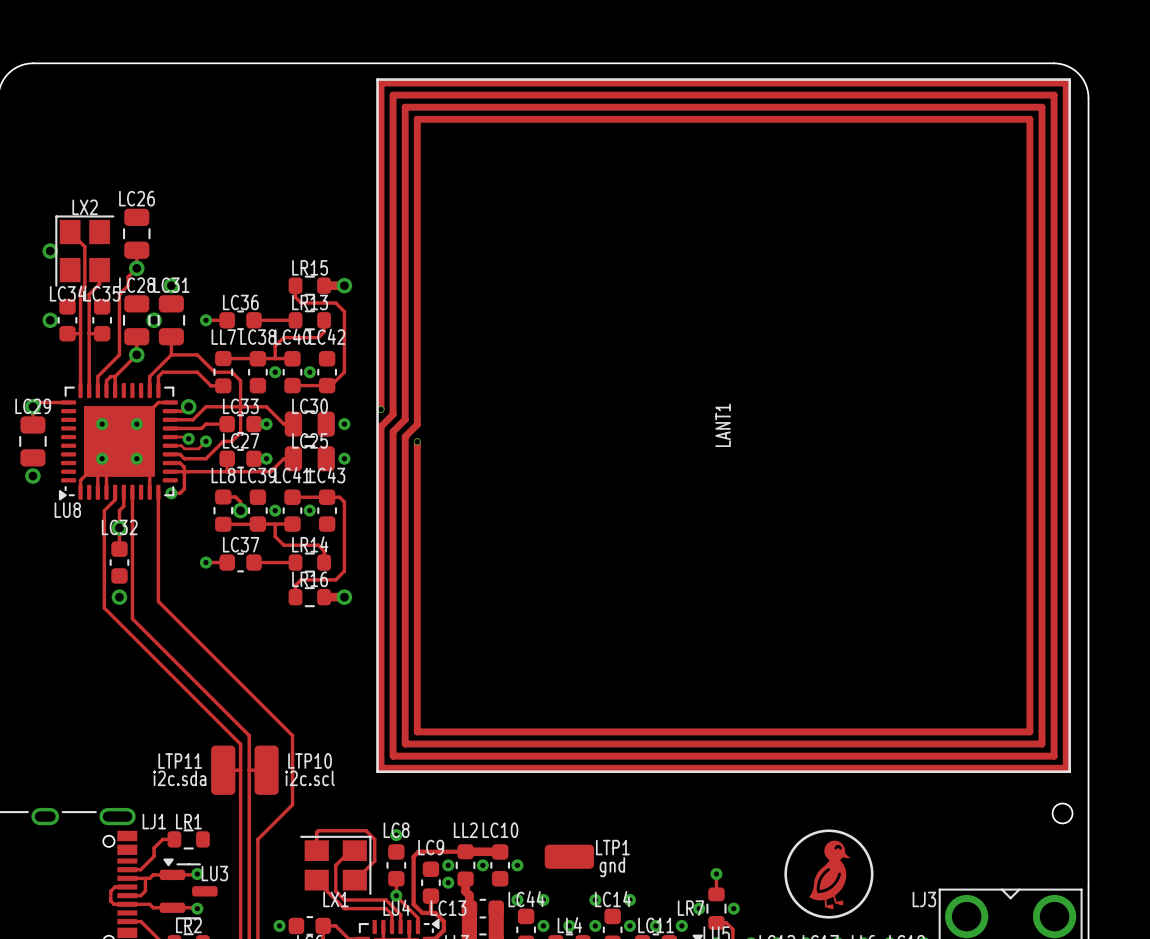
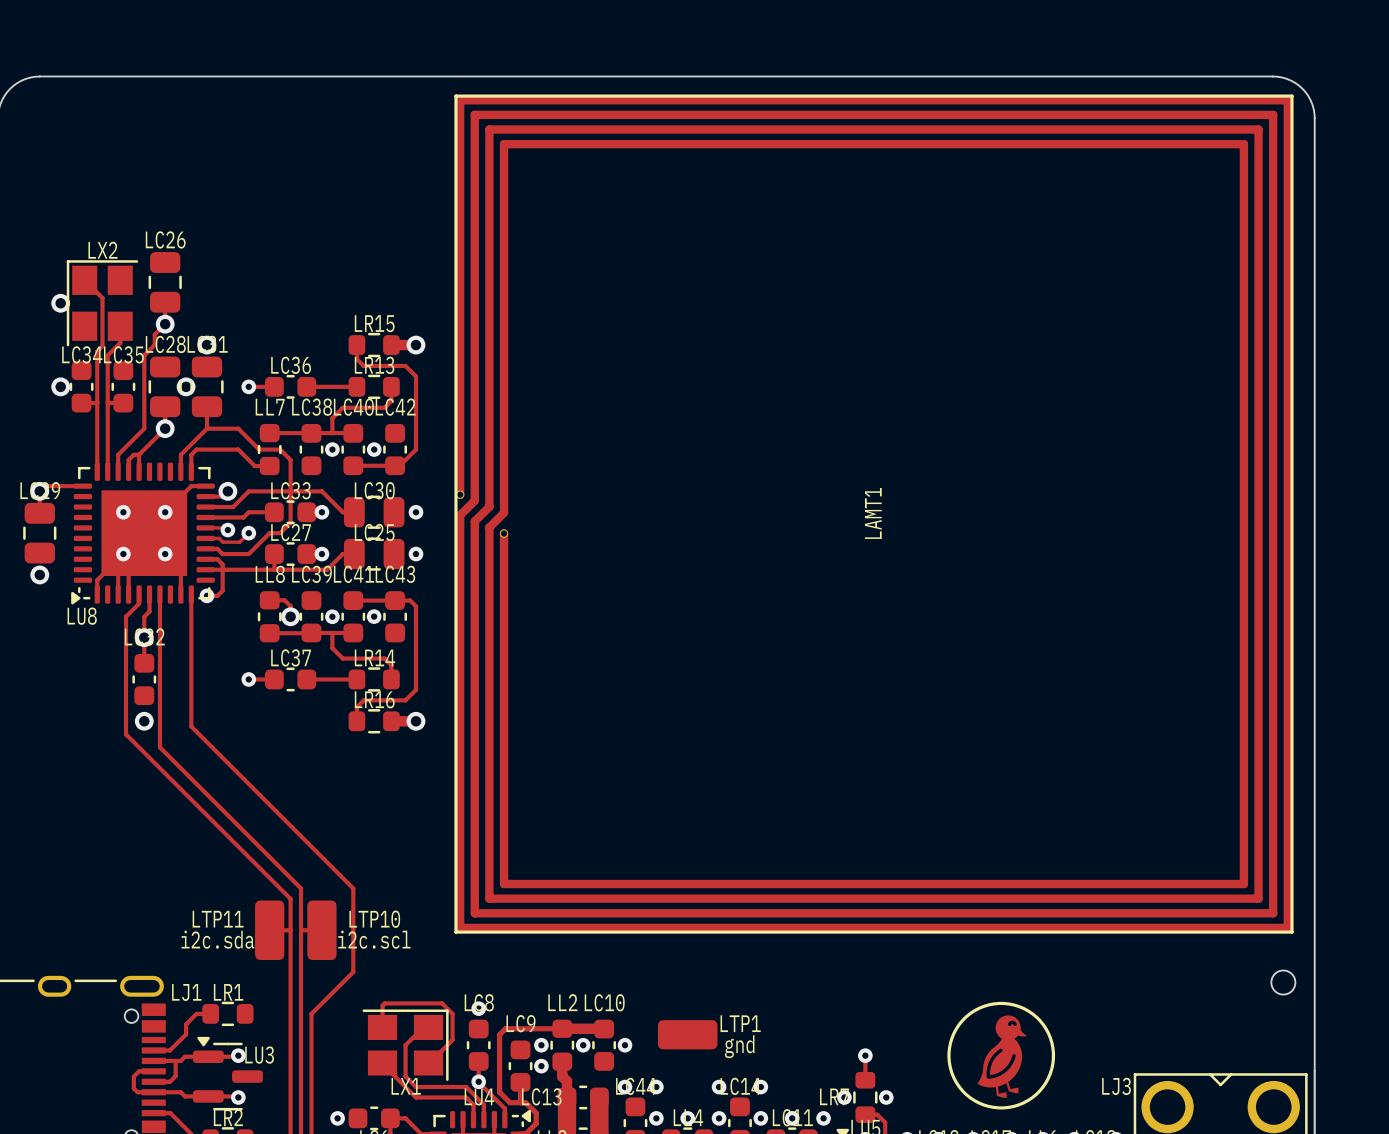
LANT1 name: LANT1 (723, 425) -> LAMT1 (873, 513)

